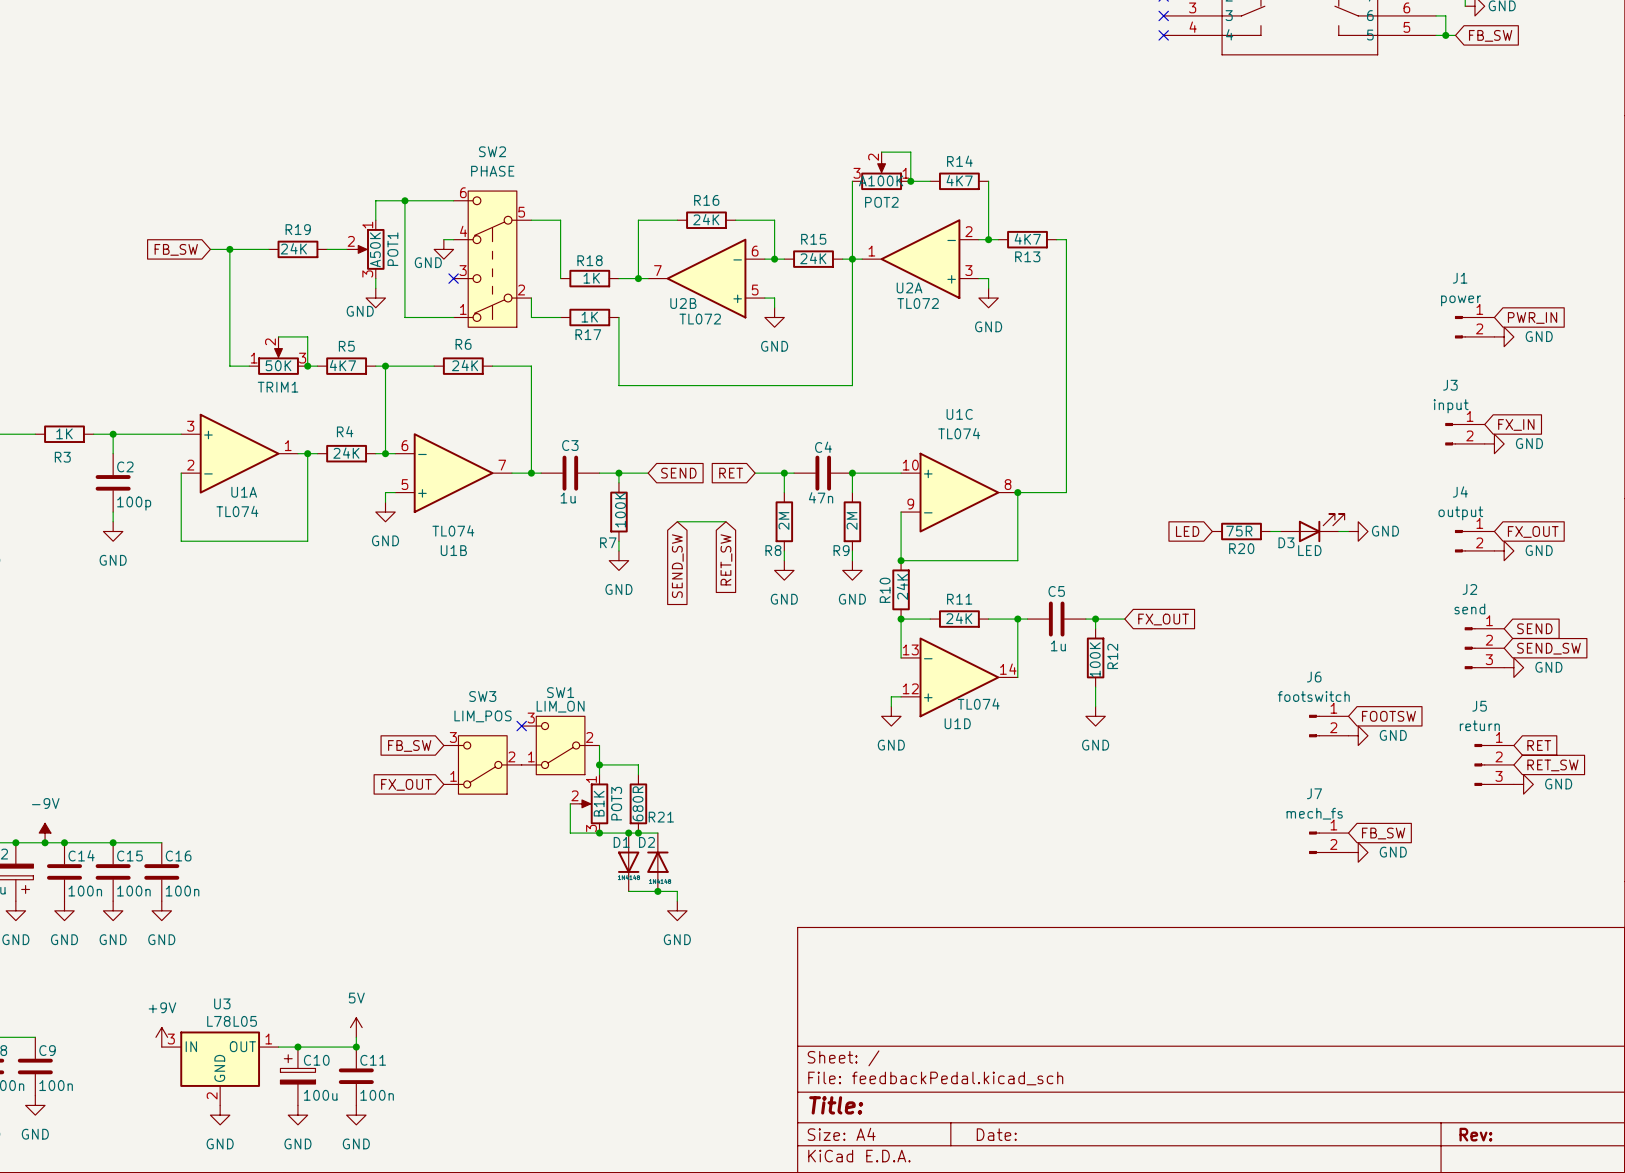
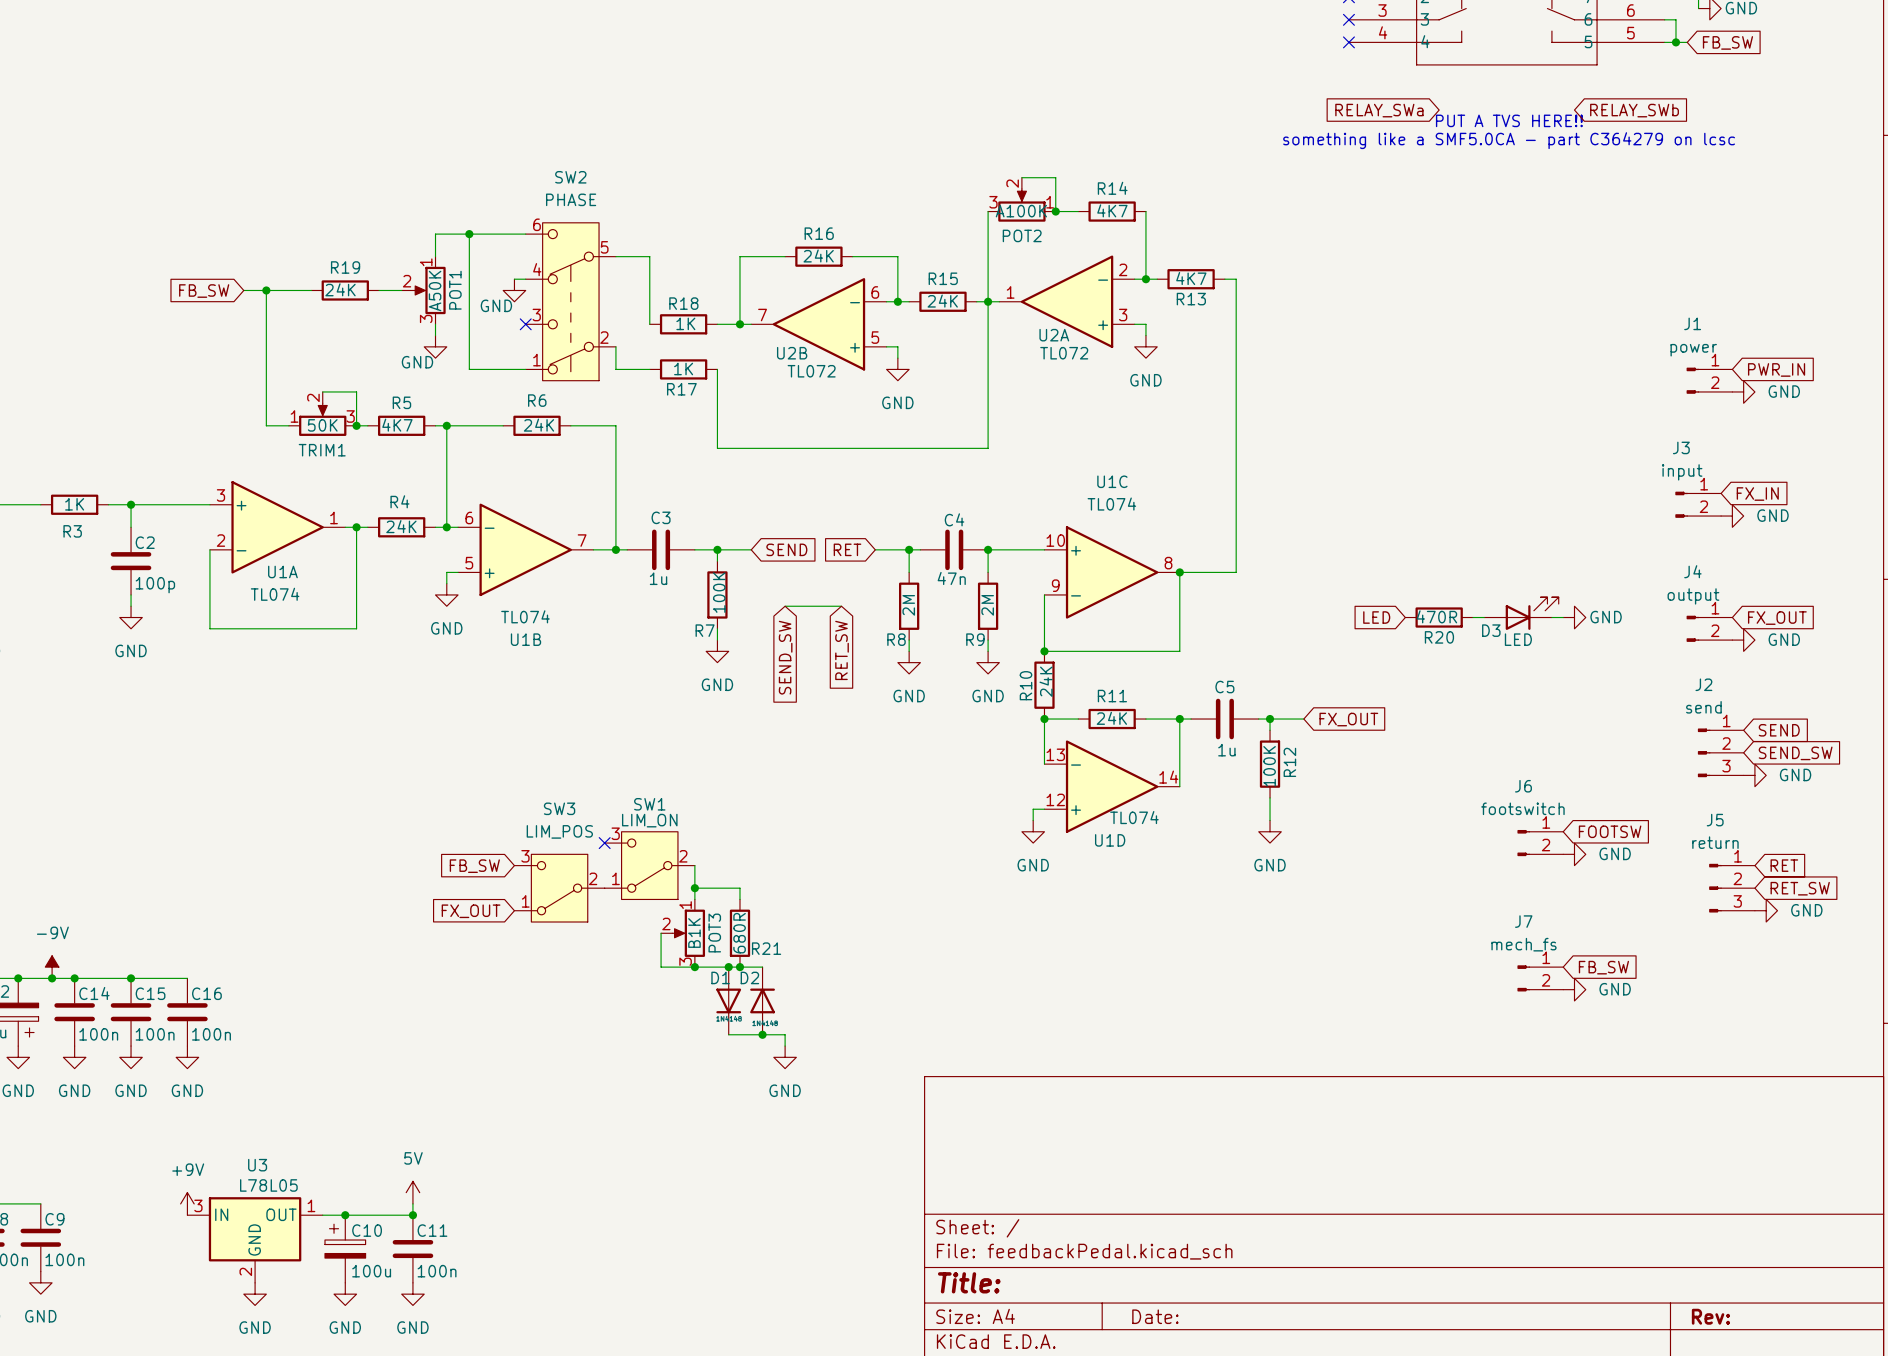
global label: none -> RELAY_SWa (1379, 110)
global label: none -> RELAY_SWb (1634, 110)
text: none -> PUT A TVS HERE!! (1509, 120)
text: none -> something like a SMF5.0CA - part C364279 on lcsc (1509, 140)
R20 value: 75R (1239, 531) -> 470R (1436, 616)

